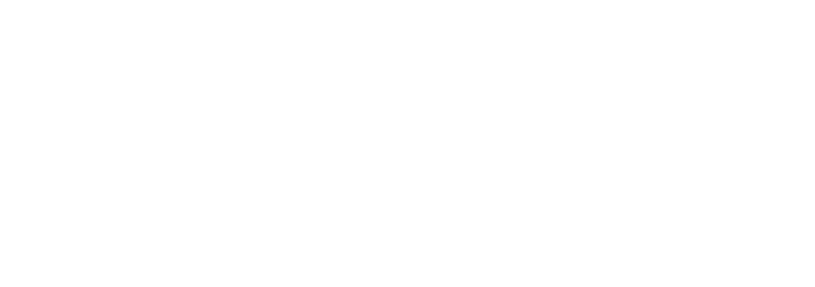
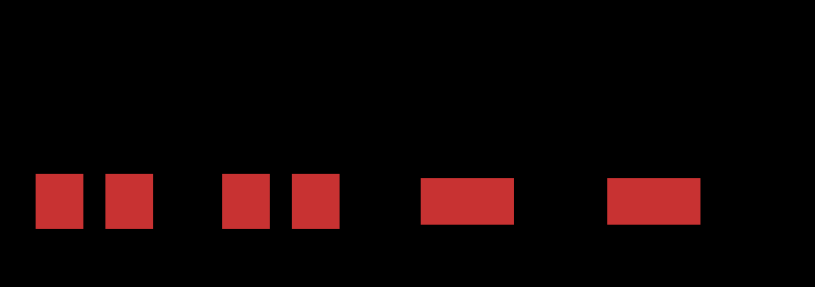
part: none -> (94, 201)
part: none -> (280, 201)
part: none -> (467, 201)
part: none -> (653, 201)

